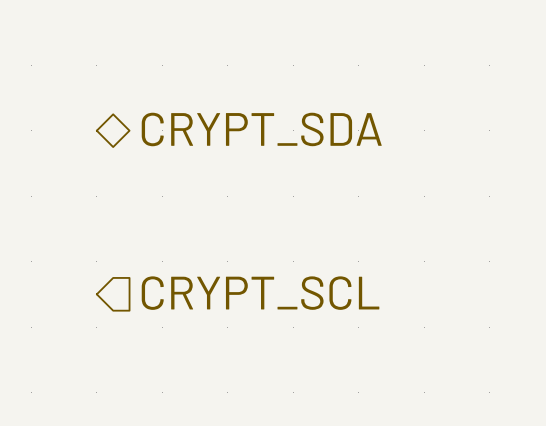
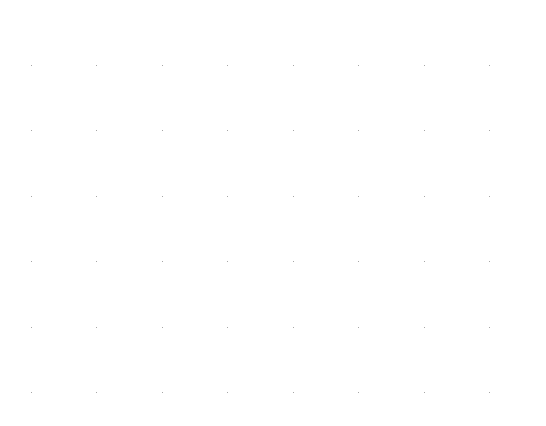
hierarchical label: CRYPT_SDA (261, 129) -> none
hierarchical label: CRYPT_SCL (260, 293) -> none

